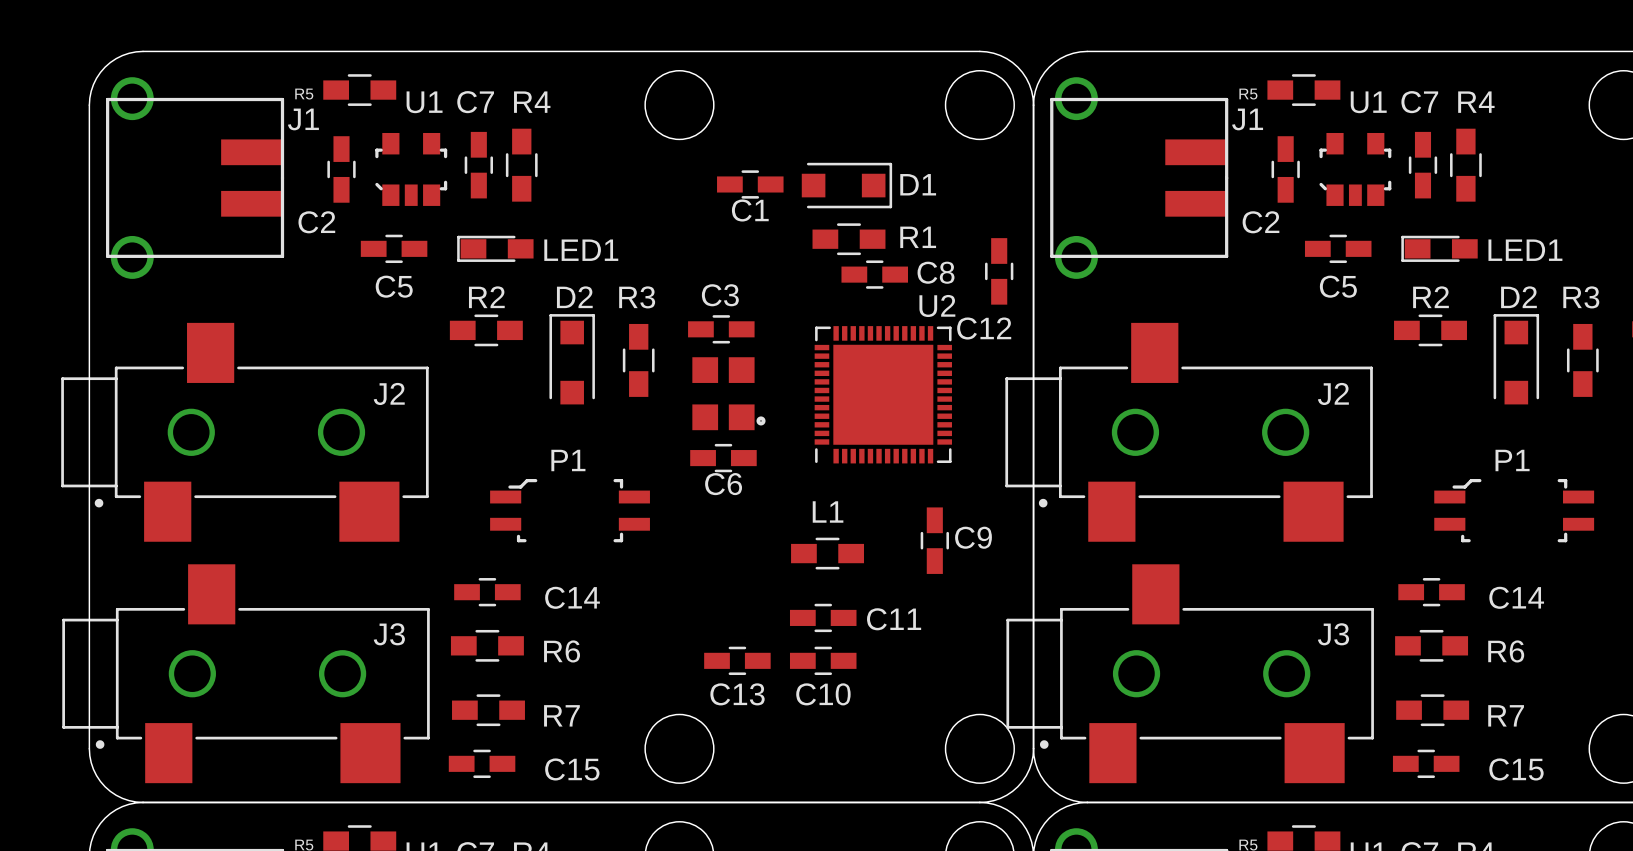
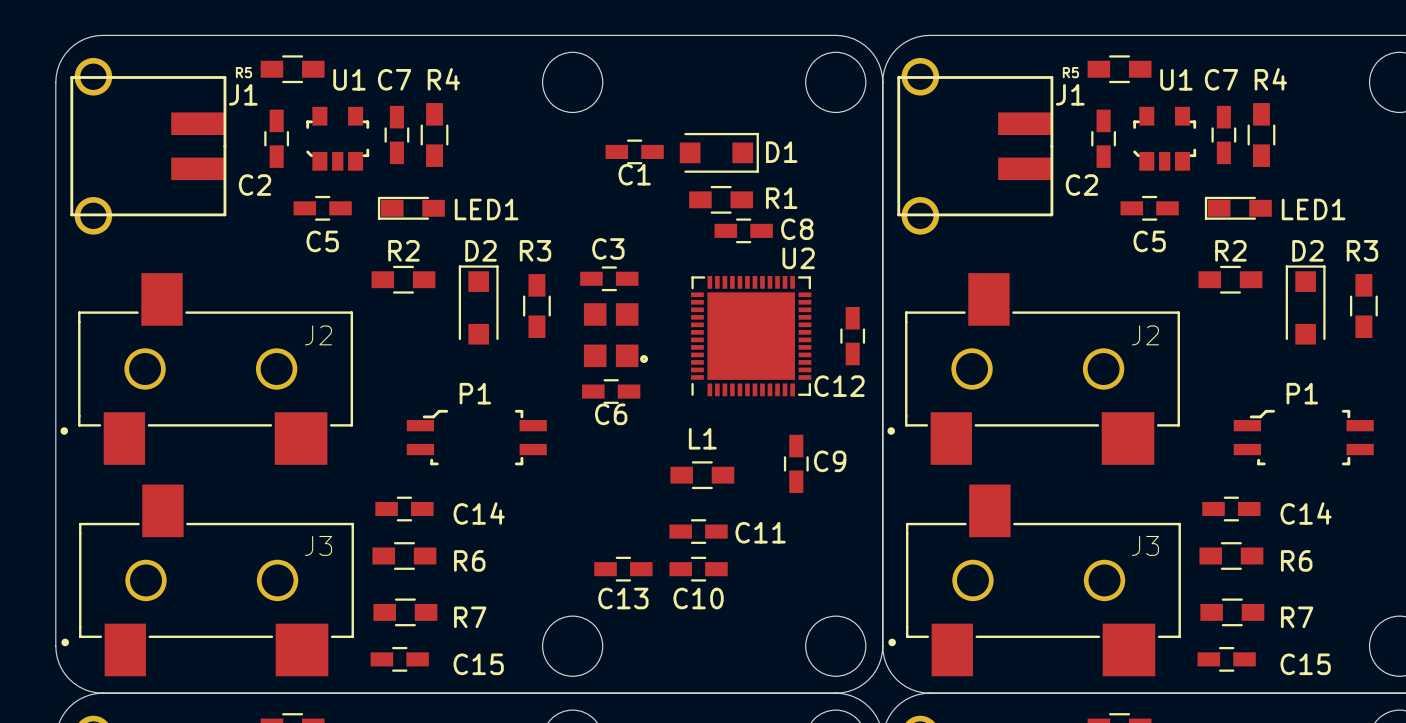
C12 position: (999, 271) -> (852, 336)
J2 footprint: [61, 322, 429, 542] -> [60, 273, 354, 465]
J2 footprint: [1005, 322, 1373, 542] -> [887, 273, 1180, 465]
J3 footprint: [62, 564, 430, 784] -> [61, 484, 354, 677]
J3 footprint: [1006, 564, 1374, 784] -> [888, 484, 1181, 677]

